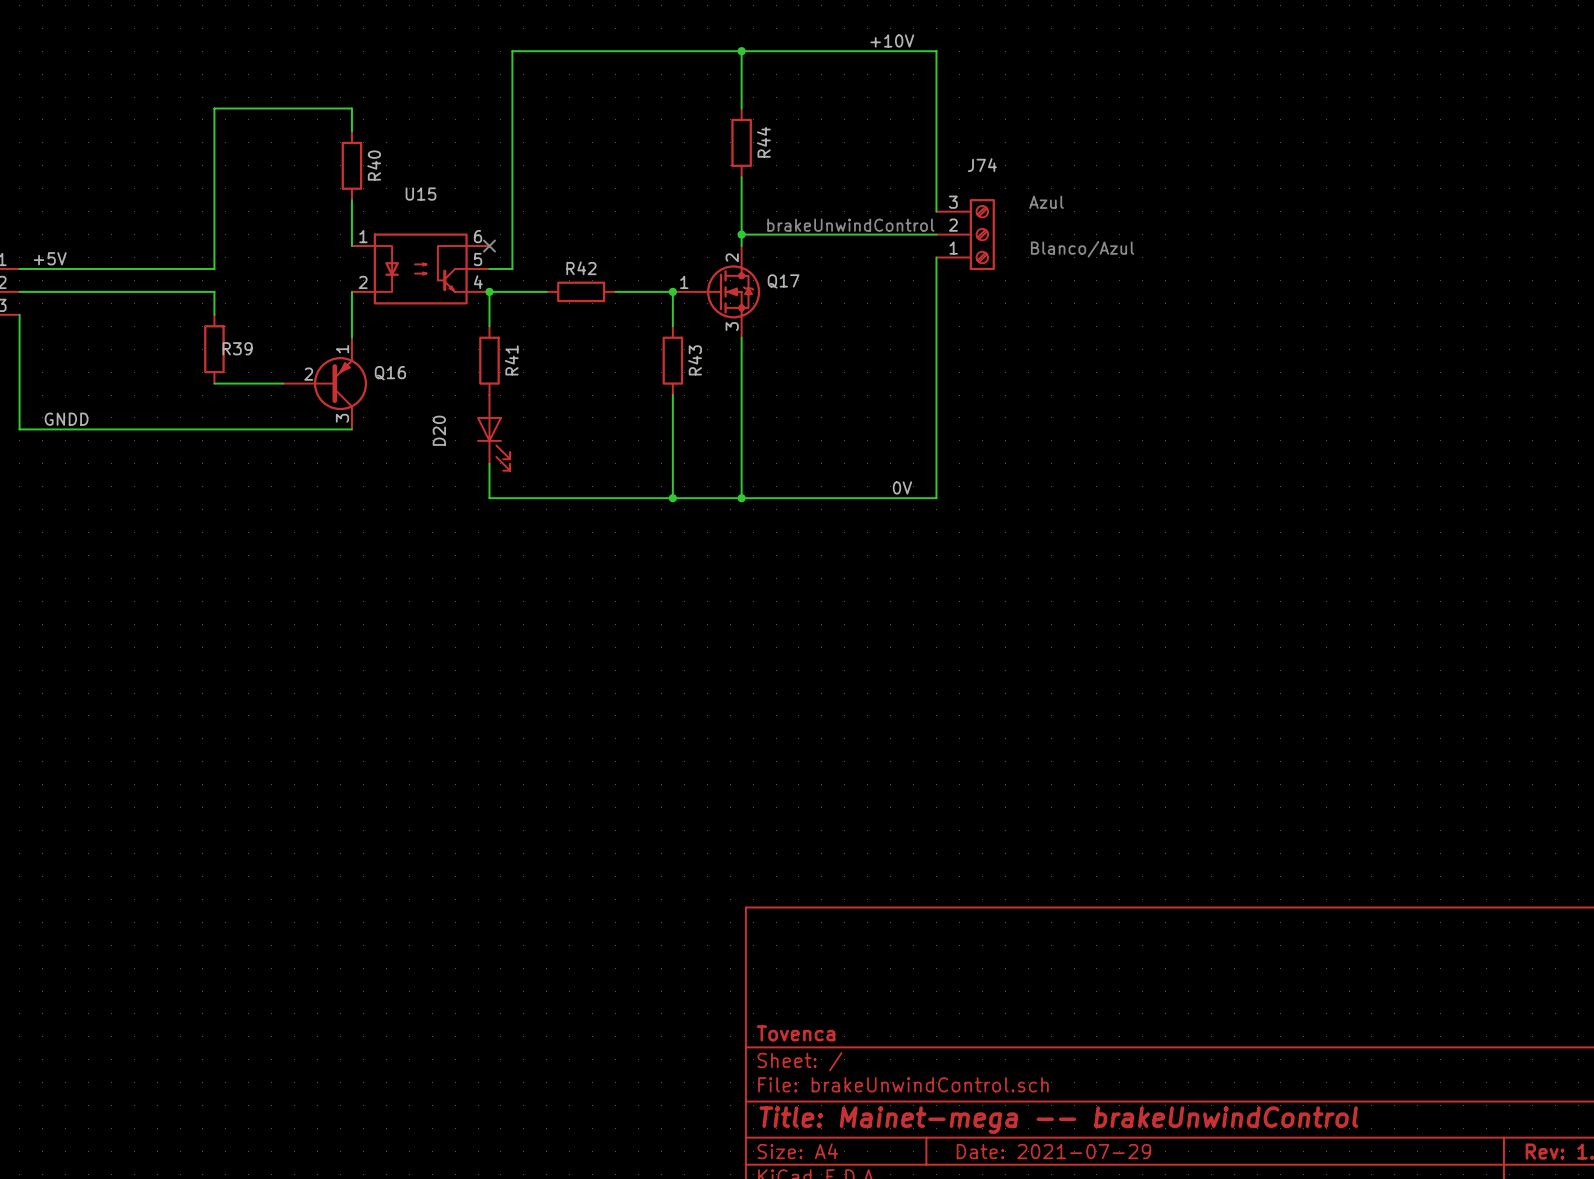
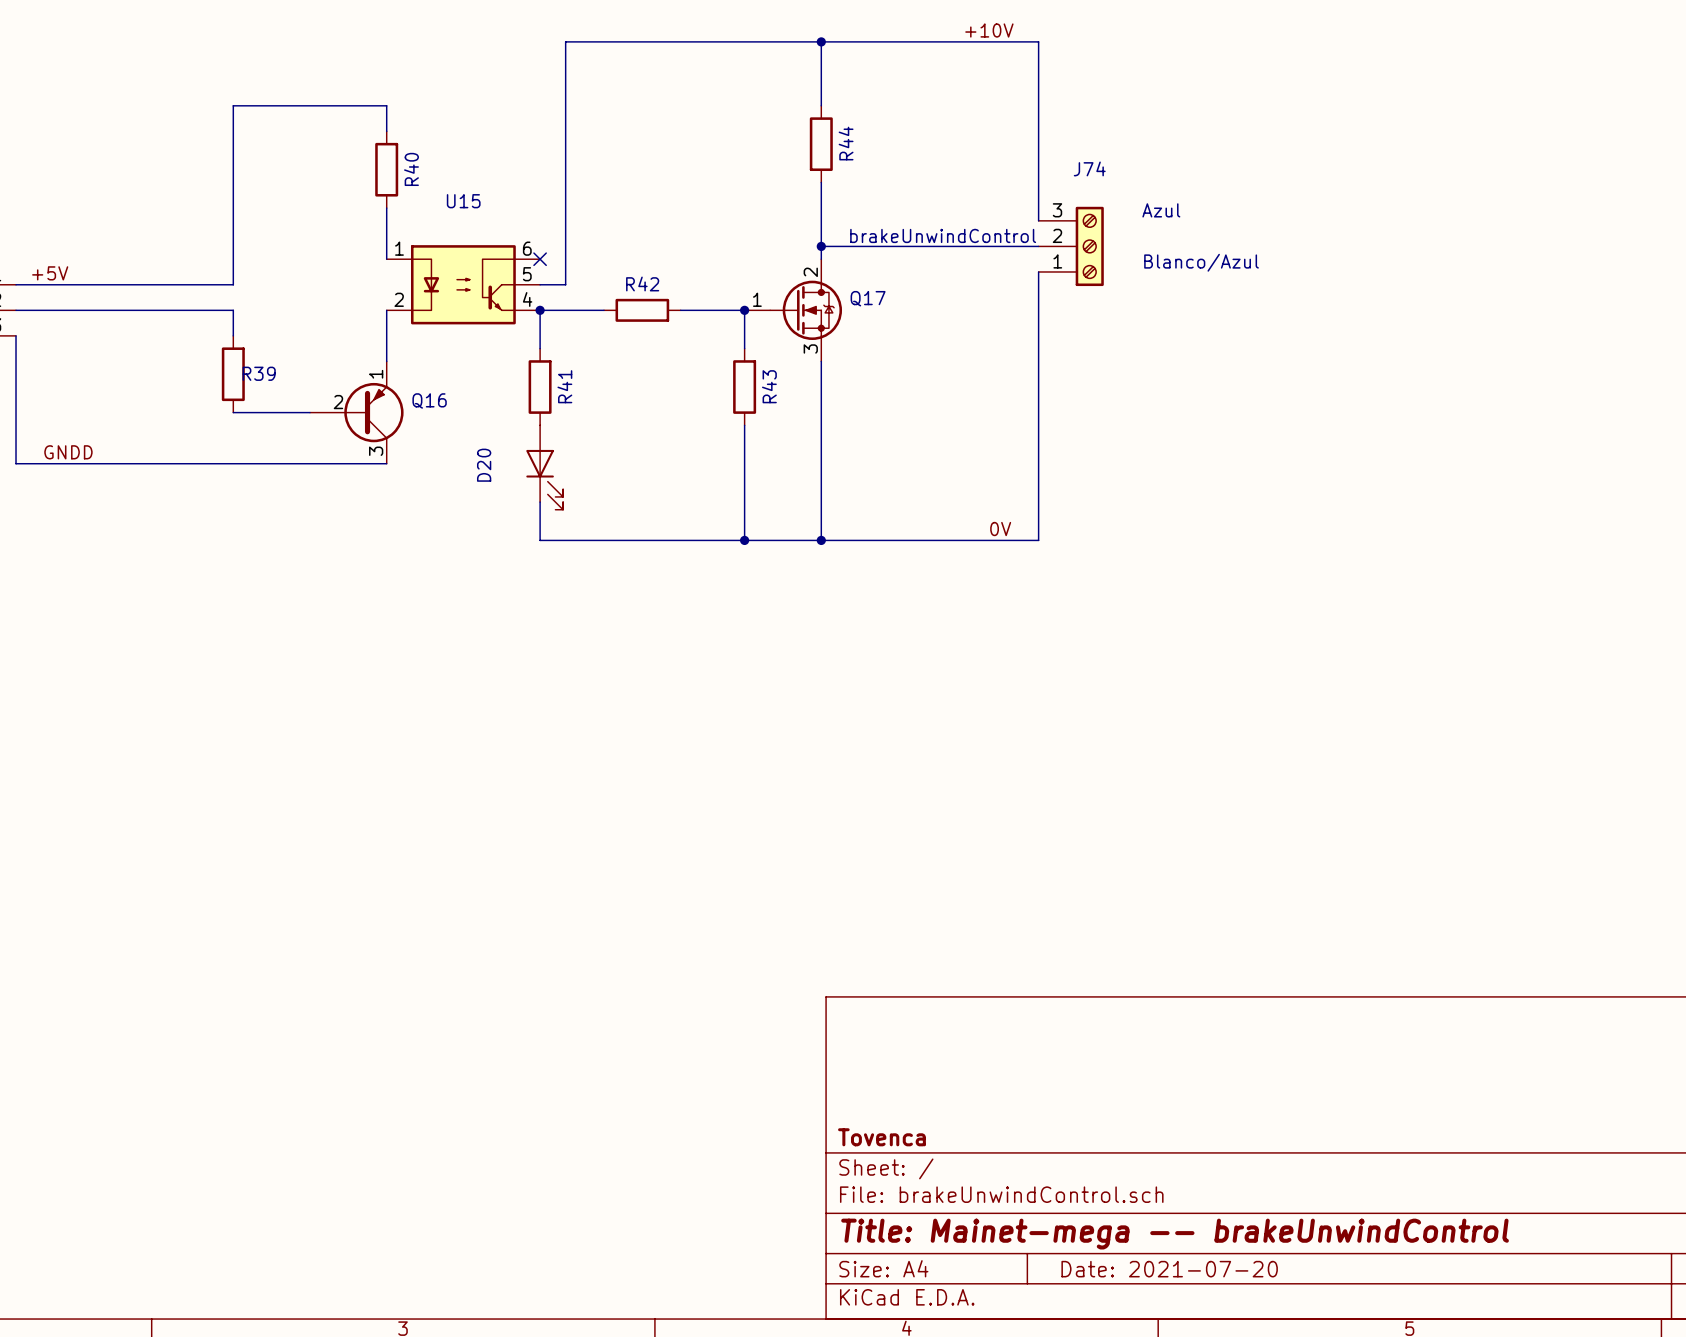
title block: Date: 2021-07-29 (1053, 1151) -> Date: 2021-07-20 (1169, 1269)

